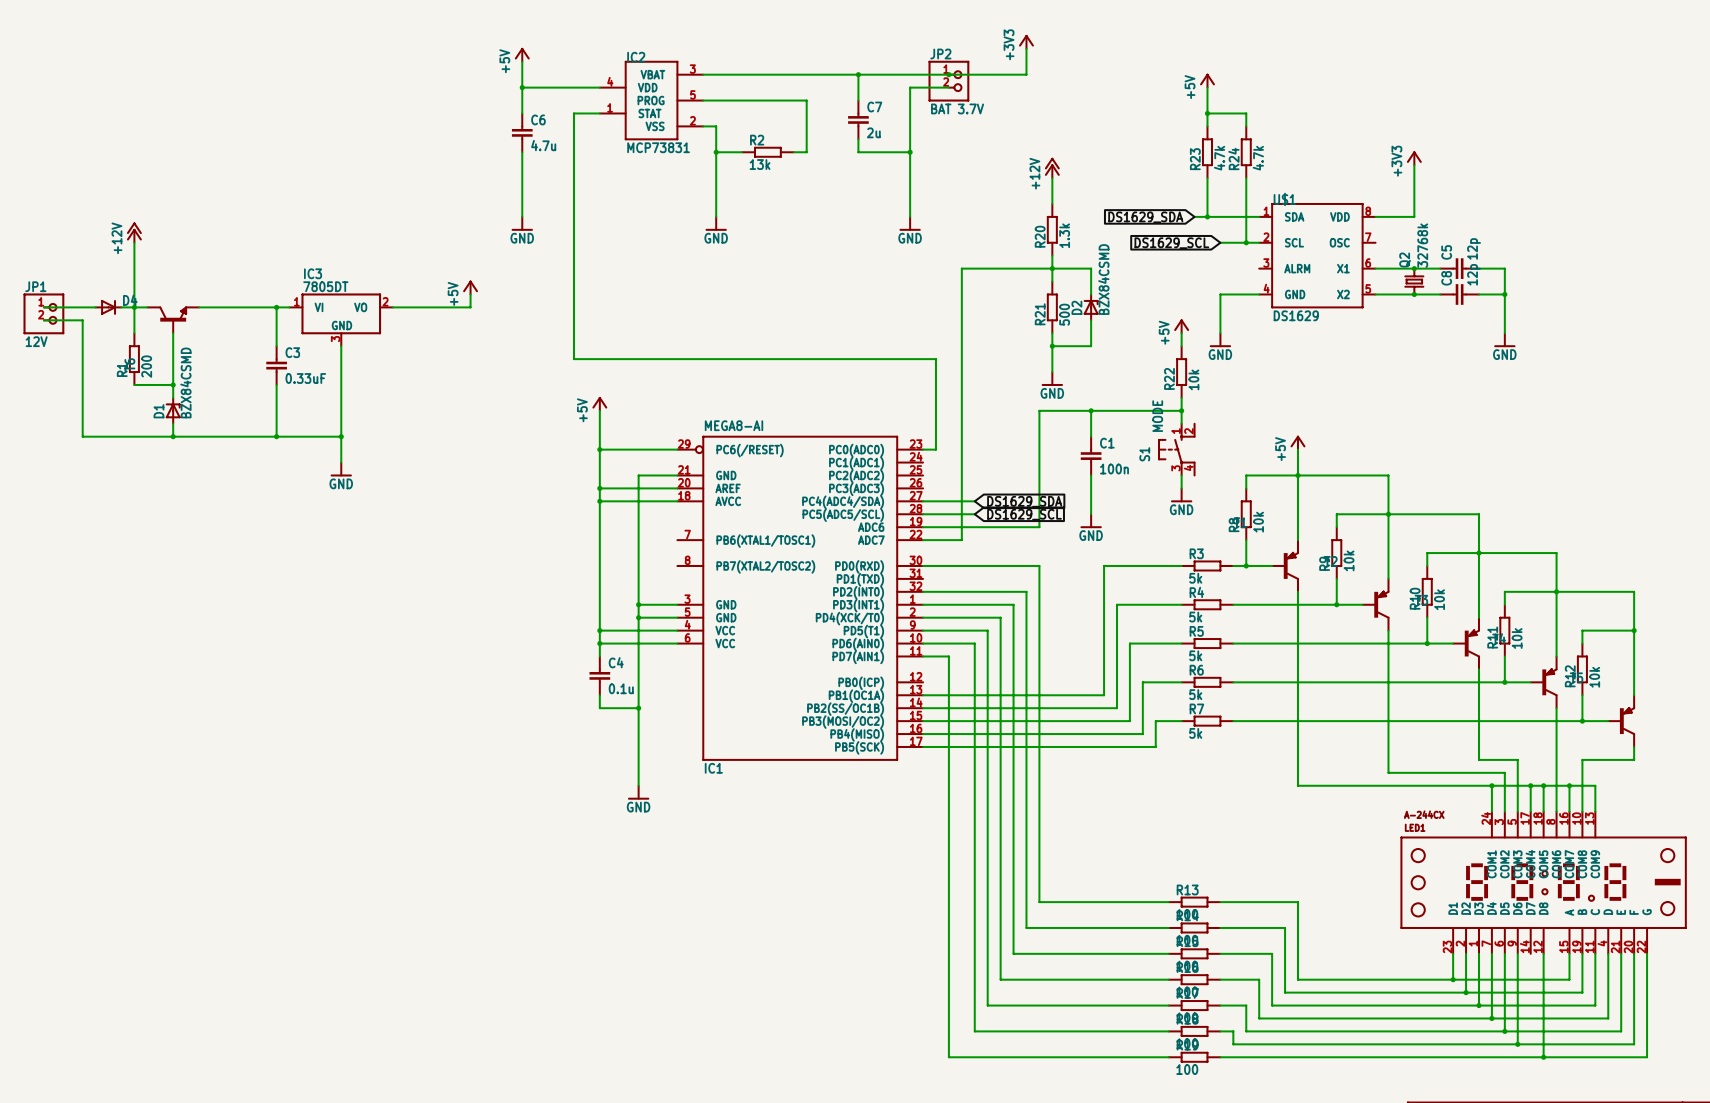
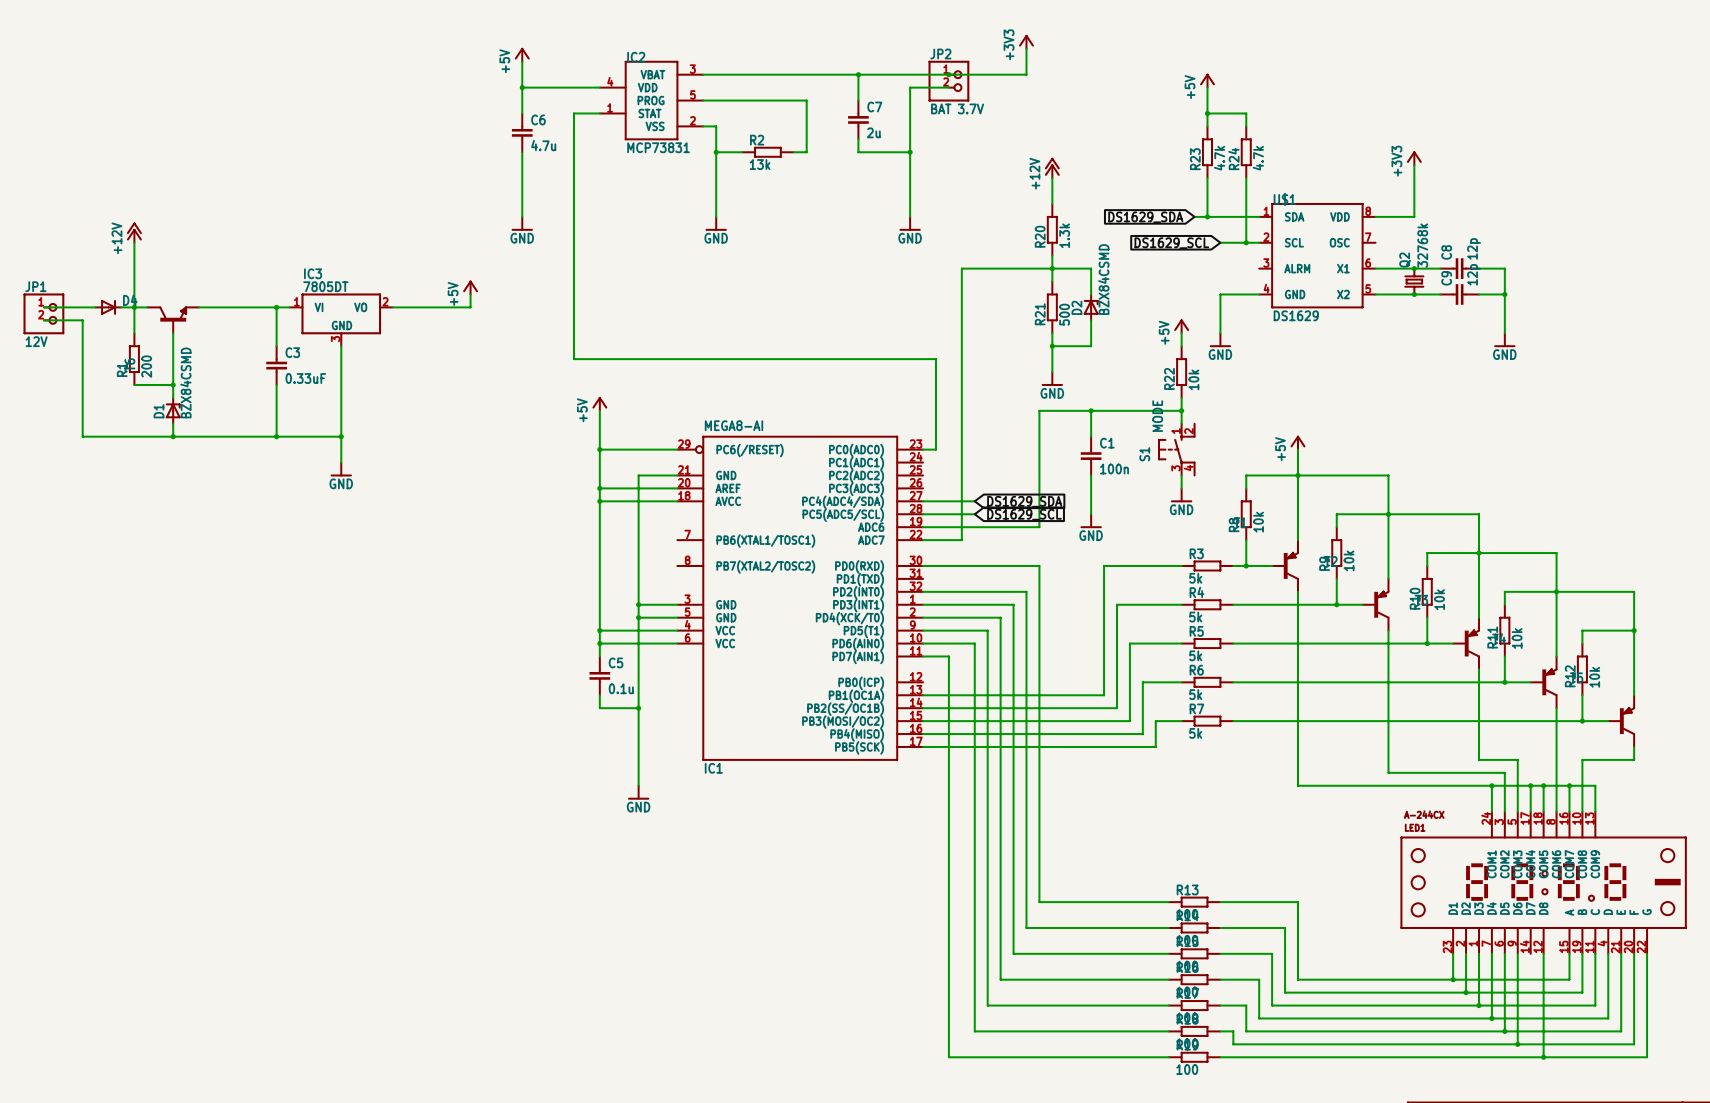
C5 name: C5 (1446, 252) -> C8 (1446, 252)
C8 name: C8 (1446, 278) -> C9 (1446, 278)
C4 name: C4 (616, 662) -> C5 (616, 662)

